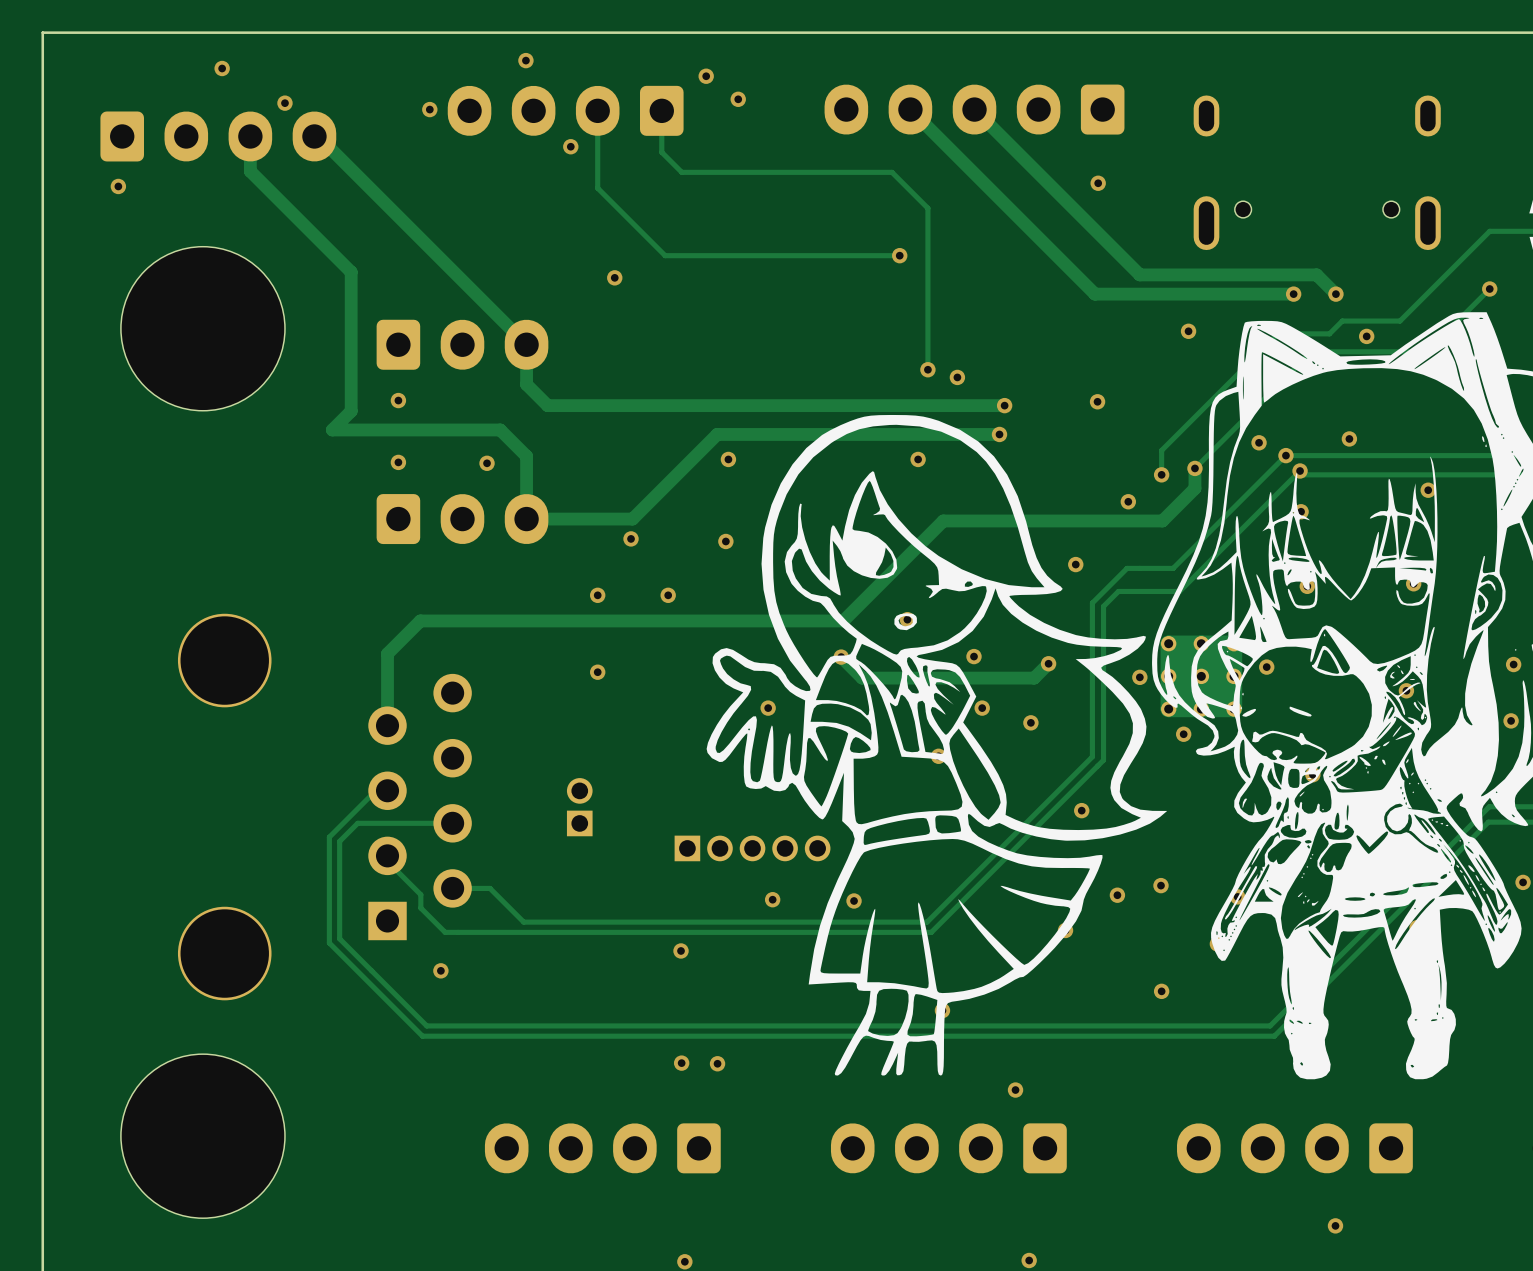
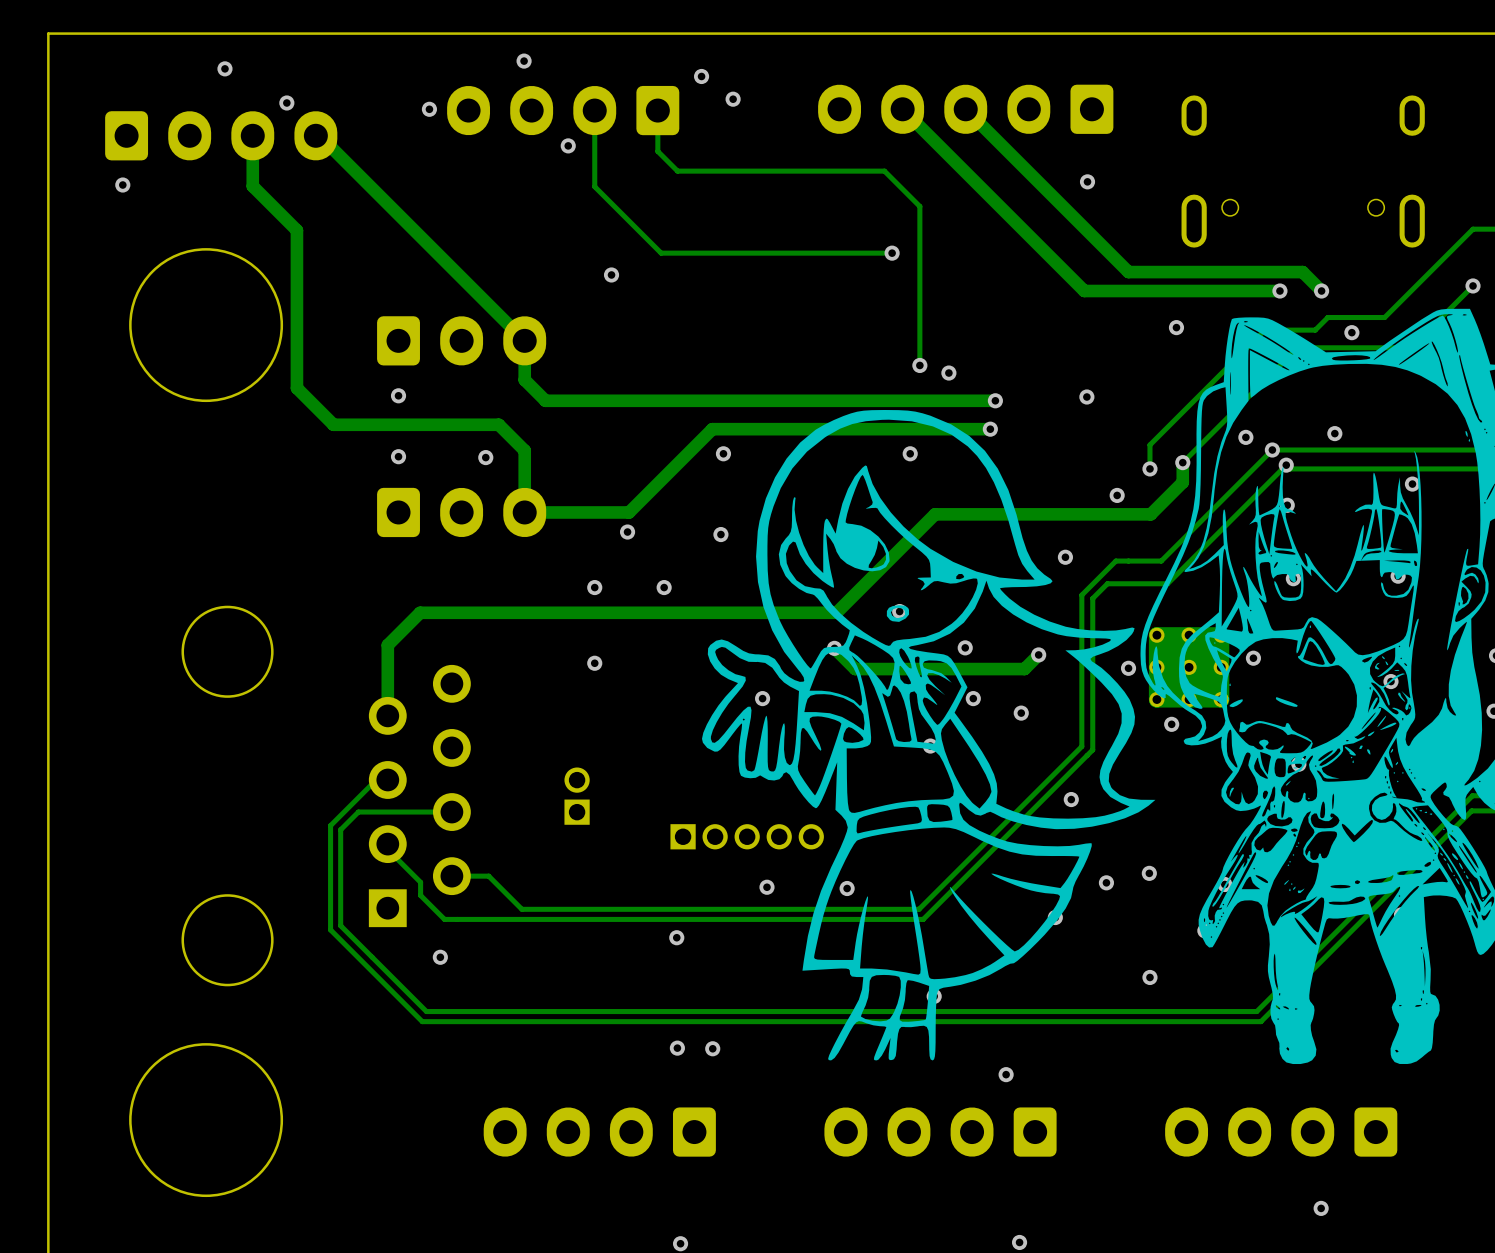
track: (250, 171) (351, 272) (351, 411) (332, 429) -> (252, 170) (252, 186) (296, 230) (296, 388) (333, 424)
round board edge: none -> [129, 248, 284, 403]
part: (202, 328) -> none
round board edge: none -> [129, 1043, 284, 1198]
part: (202, 1136) -> none

